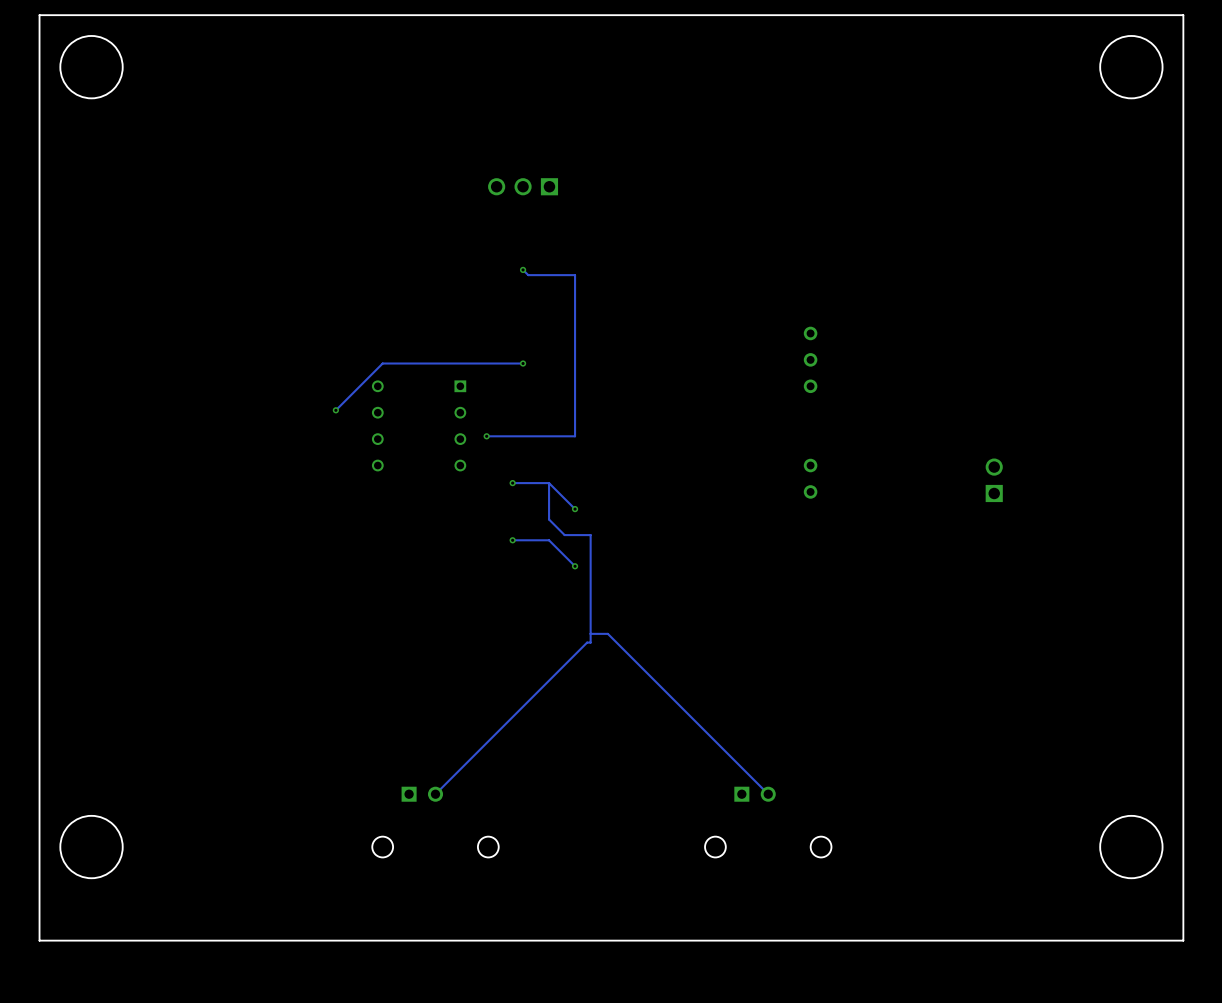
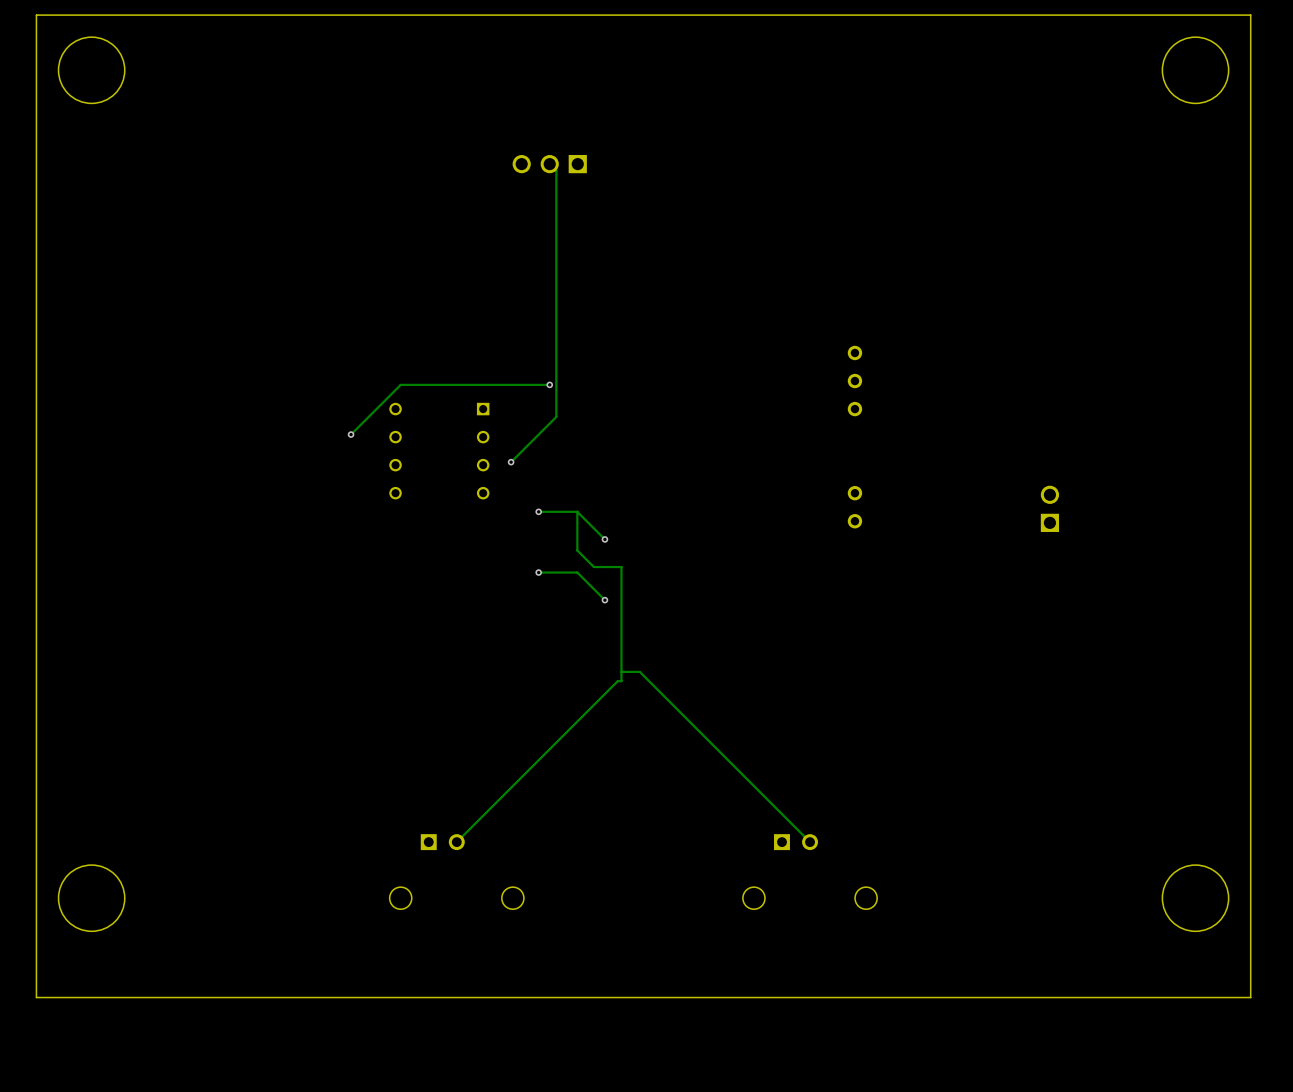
part position: (523, 186) -> (549, 164)
track: (523, 269) (528, 275) (575, 275) (575, 436) (486, 436) -> (549, 164) (556, 170) (556, 416) (511, 462)
via: (523, 269) -> none

